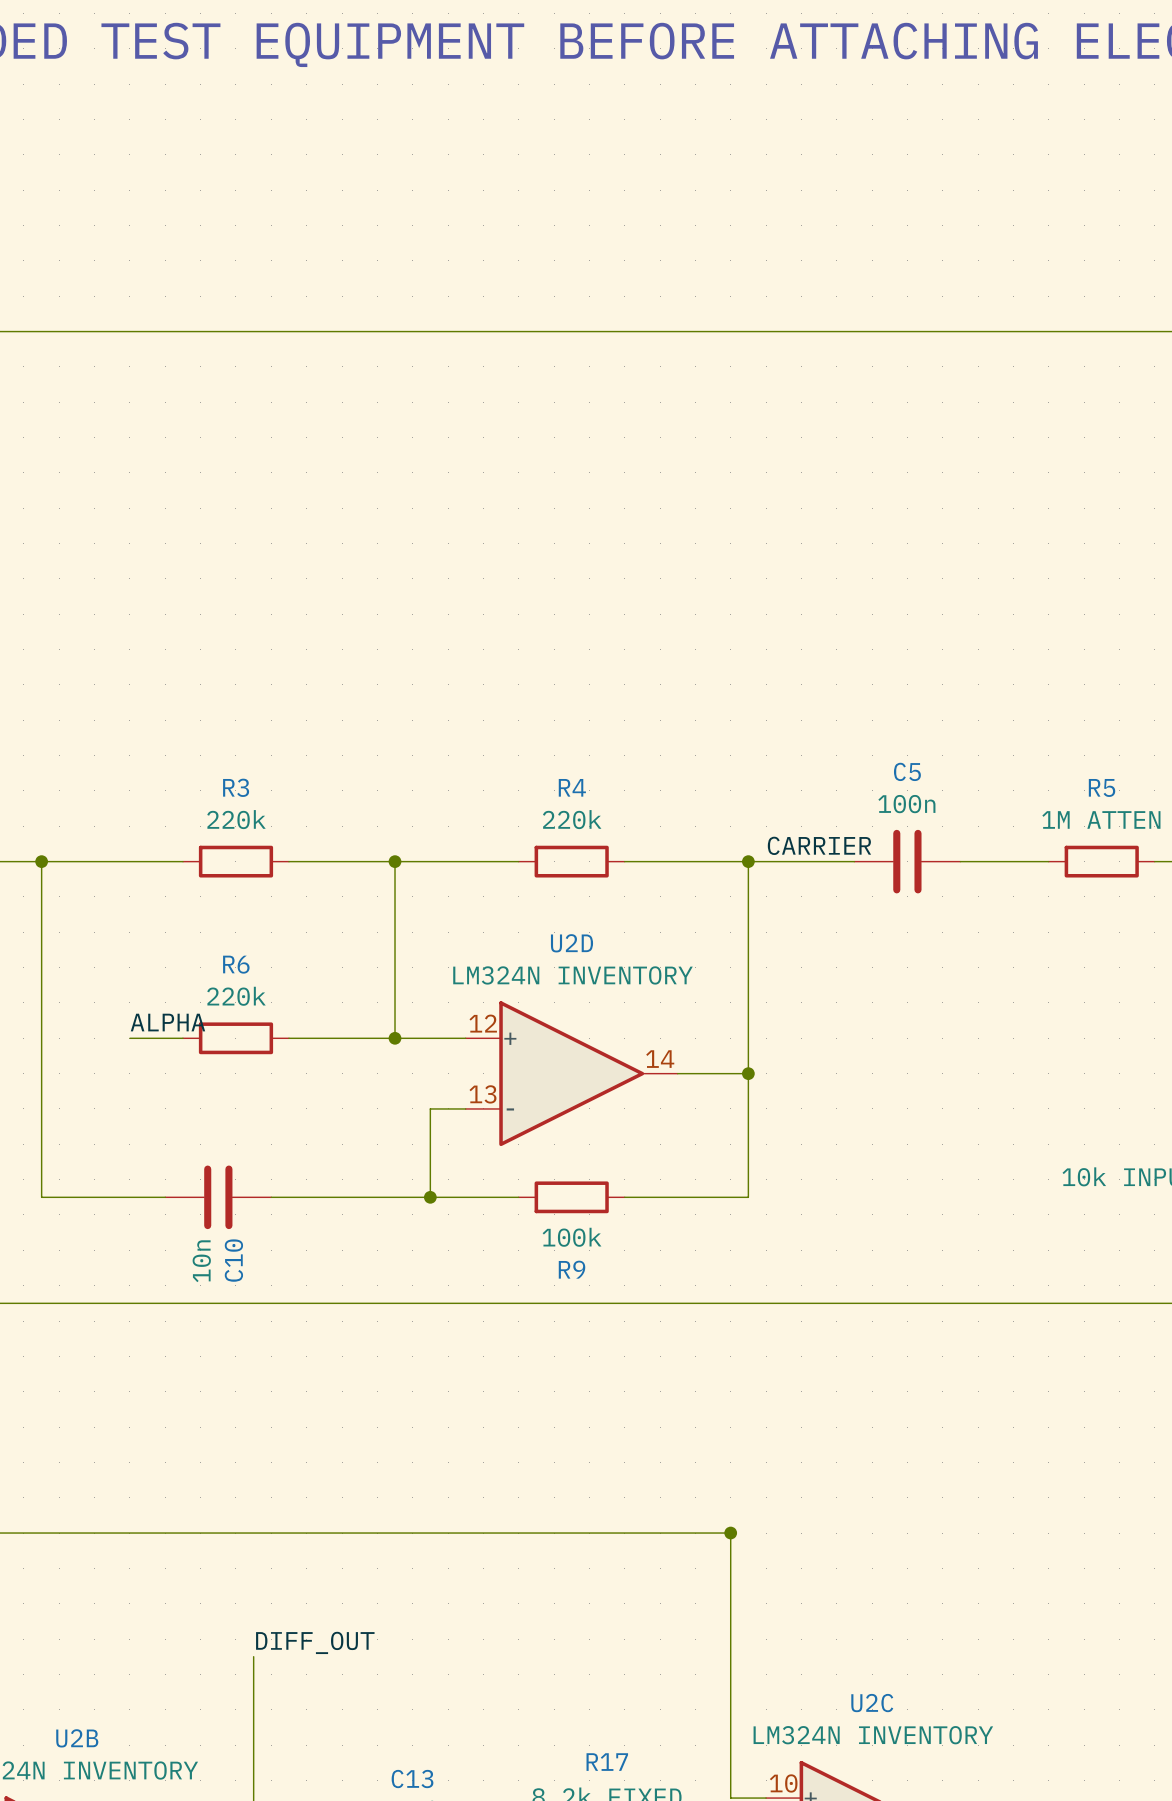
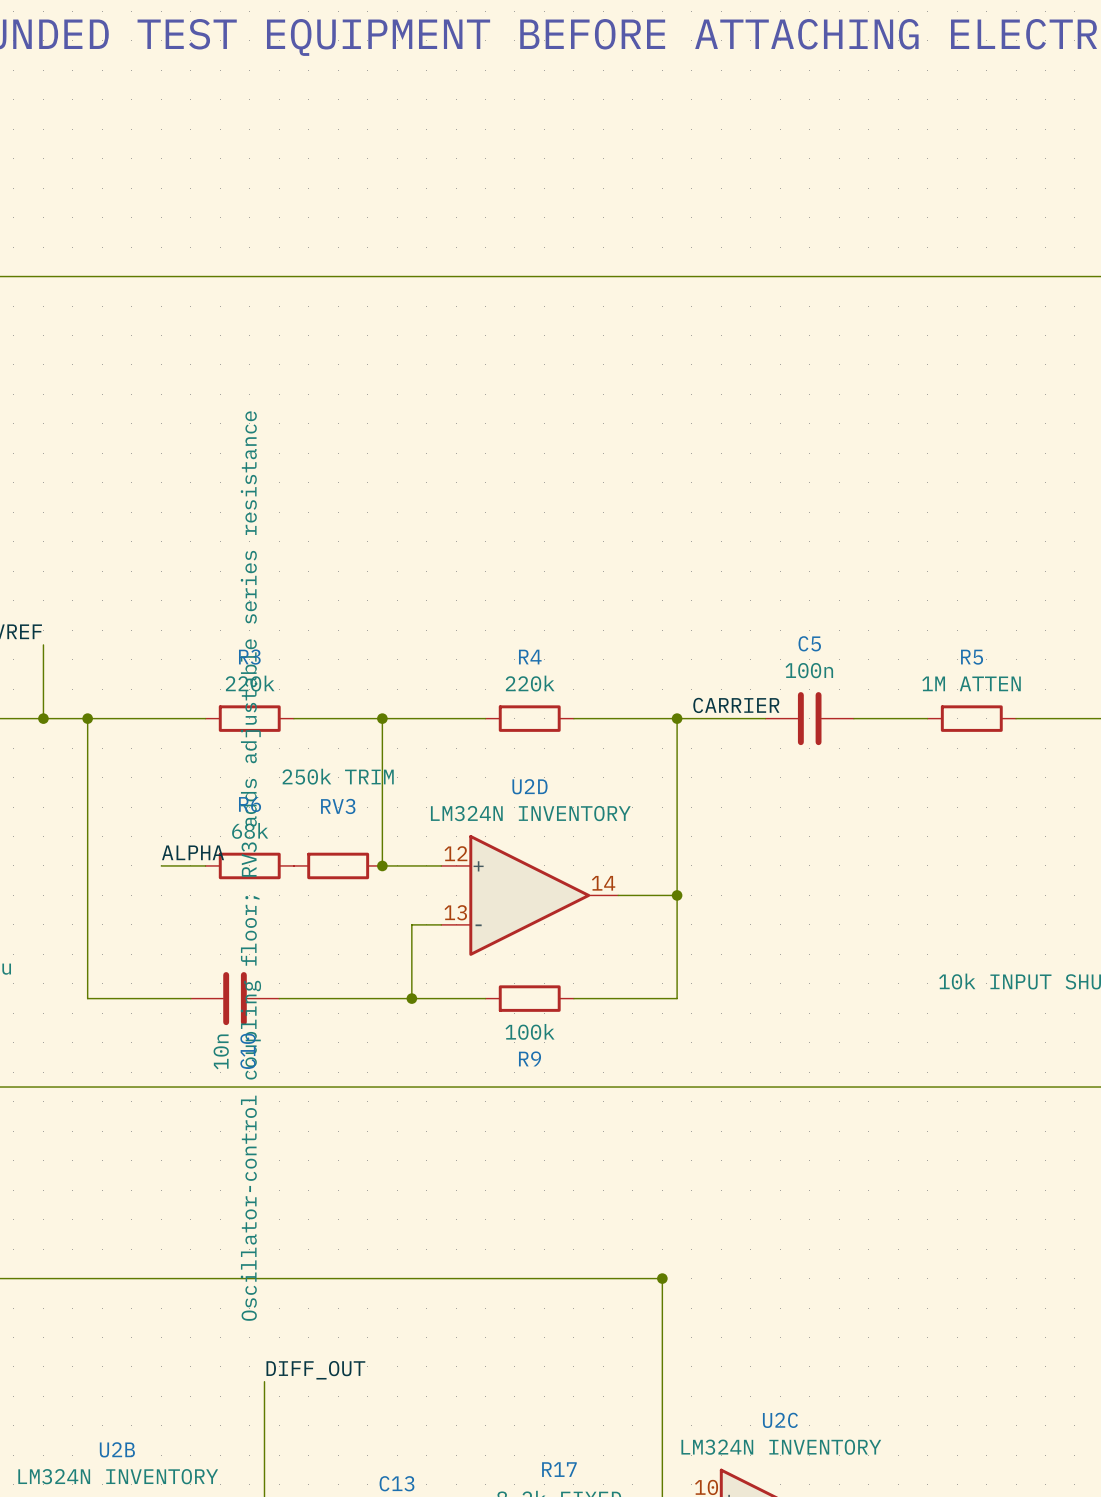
R6 value: 220k (236, 996) -> 68k (250, 830)
R6 text: none -> Oscillator-control coupling floor; RV3 adds adjustable series resistance (250, 866)
wire: (288, 1038) (395, 1038) -> none
RV3: none -> 250k TRIM (338, 865)

